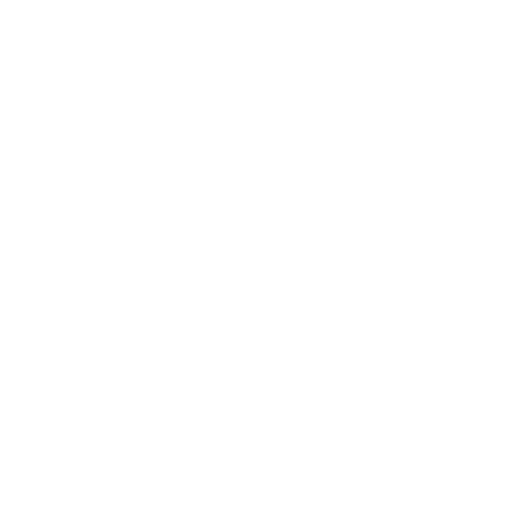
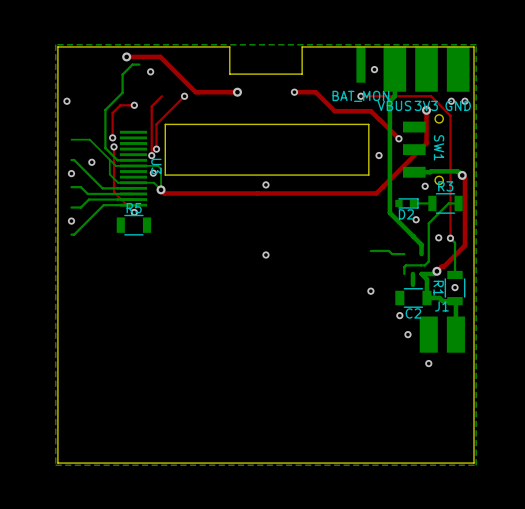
bottom zone outline: none -> (476, 44) (55, 44) (55, 465) (476, 465) (476, 44)
board edge: none -> (474, 46) (302, 46) (302, 74) (229, 74) (229, 46) (57, 46) (57, 463) (474, 463) (474, 46)
top track: none -> (126, 56) (160, 56) (195, 92) (237, 92)
via: none -> (126, 56)
bottom track: none -> (139, 64) (132, 64) (122, 74) (122, 92) (105, 109) (105, 148) (117, 160) (133, 160)
part: none -> BAT_MON (360, 64)
via: none -> (374, 69)
bottom track: none -> (394, 69) (394, 96) (389, 101) (389, 212) (413, 236)
part: none -> VBUS (394, 69)
part: none -> 3V3 (426, 69)
part: none -> GND (458, 69)
via: none -> (150, 71)
via: none -> (237, 92)
top track: none -> (294, 92) (315, 92) (334, 111) (370, 111) (398, 138)
via: none -> (294, 92)
top track: none -> (161, 96) (151, 106) (151, 155)
top track: none -> (184, 96) (156, 124) (156, 149)
via: none -> (184, 96)
top track: none -> (360, 96) (431, 96) (450, 115) (450, 238)
via: none -> (360, 96)
via: none -> (66, 101)
via: none -> (451, 101)
via: none -> (464, 101)
top track: none -> (134, 105) (120, 105) (112, 113) (112, 137)
via: none -> (134, 105)
top track: none -> (426, 110) (426, 143) (376, 193) (164, 193) (161, 189)
via: none -> (426, 110)
board edge: none -> (368, 124) (368, 175) (165, 175) (165, 124) (368, 124)
via: none -> (112, 137)
via: none -> (398, 138)
bottom track: none -> (71, 139) (89, 139) (115, 165) (157, 165) (161, 169) (161, 189) (153, 182) (118, 182) (109, 174) (109, 159)
top track: none -> (114, 146) (114, 192) (134, 212)
via: none -> (114, 146)
via: none -> (156, 149)
SW1: none -> (423, 149)
via: none -> (151, 155)
via: none -> (379, 155)
bottom track: none -> (71, 160) (74, 160) (102, 188) (133, 188)
via: none -> (91, 162)
U3: none -> (133, 168)
bottom track: none -> (414, 172) (457, 171) (462, 175)
via: none -> (71, 173)
via: none -> (153, 173)
top track: none -> (462, 175) (464, 178) (464, 245) (436, 271)
via: none -> (462, 175)
via: none -> (265, 184)
via: none -> (425, 186)
bottom track: none -> (71, 187) (80, 187) (87, 193) (133, 193)
via: none -> (161, 189)
bottom track: none -> (133, 199) (88, 199) (80, 207) (71, 207)
D2: none -> (406, 203)
bottom track: none -> (432, 203) (413, 203)
R3: none -> (445, 203)
bottom track: none -> (458, 203) (448, 203) (428, 223) (428, 261) (424, 265) (405, 265) (404, 274)
bottom track: none -> (133, 205) (103, 205) (74, 234) (71, 234)
via: none -> (134, 212)
via: none -> (416, 219)
via: none -> (71, 221)
R5: none -> (133, 225)
bottom track: none -> (413, 236) (421, 244) (421, 254)
via: none -> (438, 237)
bottom track: none -> (450, 238) (455, 242) (455, 274)
via: none -> (450, 238)
bottom track: none -> (370, 250) (388, 250) (392, 254) (404, 254)
via: none -> (265, 255)
bottom track: none -> (436, 271) (434, 274) (421, 274) (426, 279) (426, 297) (439, 297) (442, 301) (455, 302) (455, 334)
via: none -> (436, 271)
bottom track: none -> (412, 274) (412, 284)
via: none -> (455, 287)
R1: none -> (455, 288)
via: none -> (370, 291)
C2: none -> (413, 297)
via: none -> (399, 315)
via: none -> (407, 334)
J1: none -> (442, 334)
via: none -> (428, 363)

